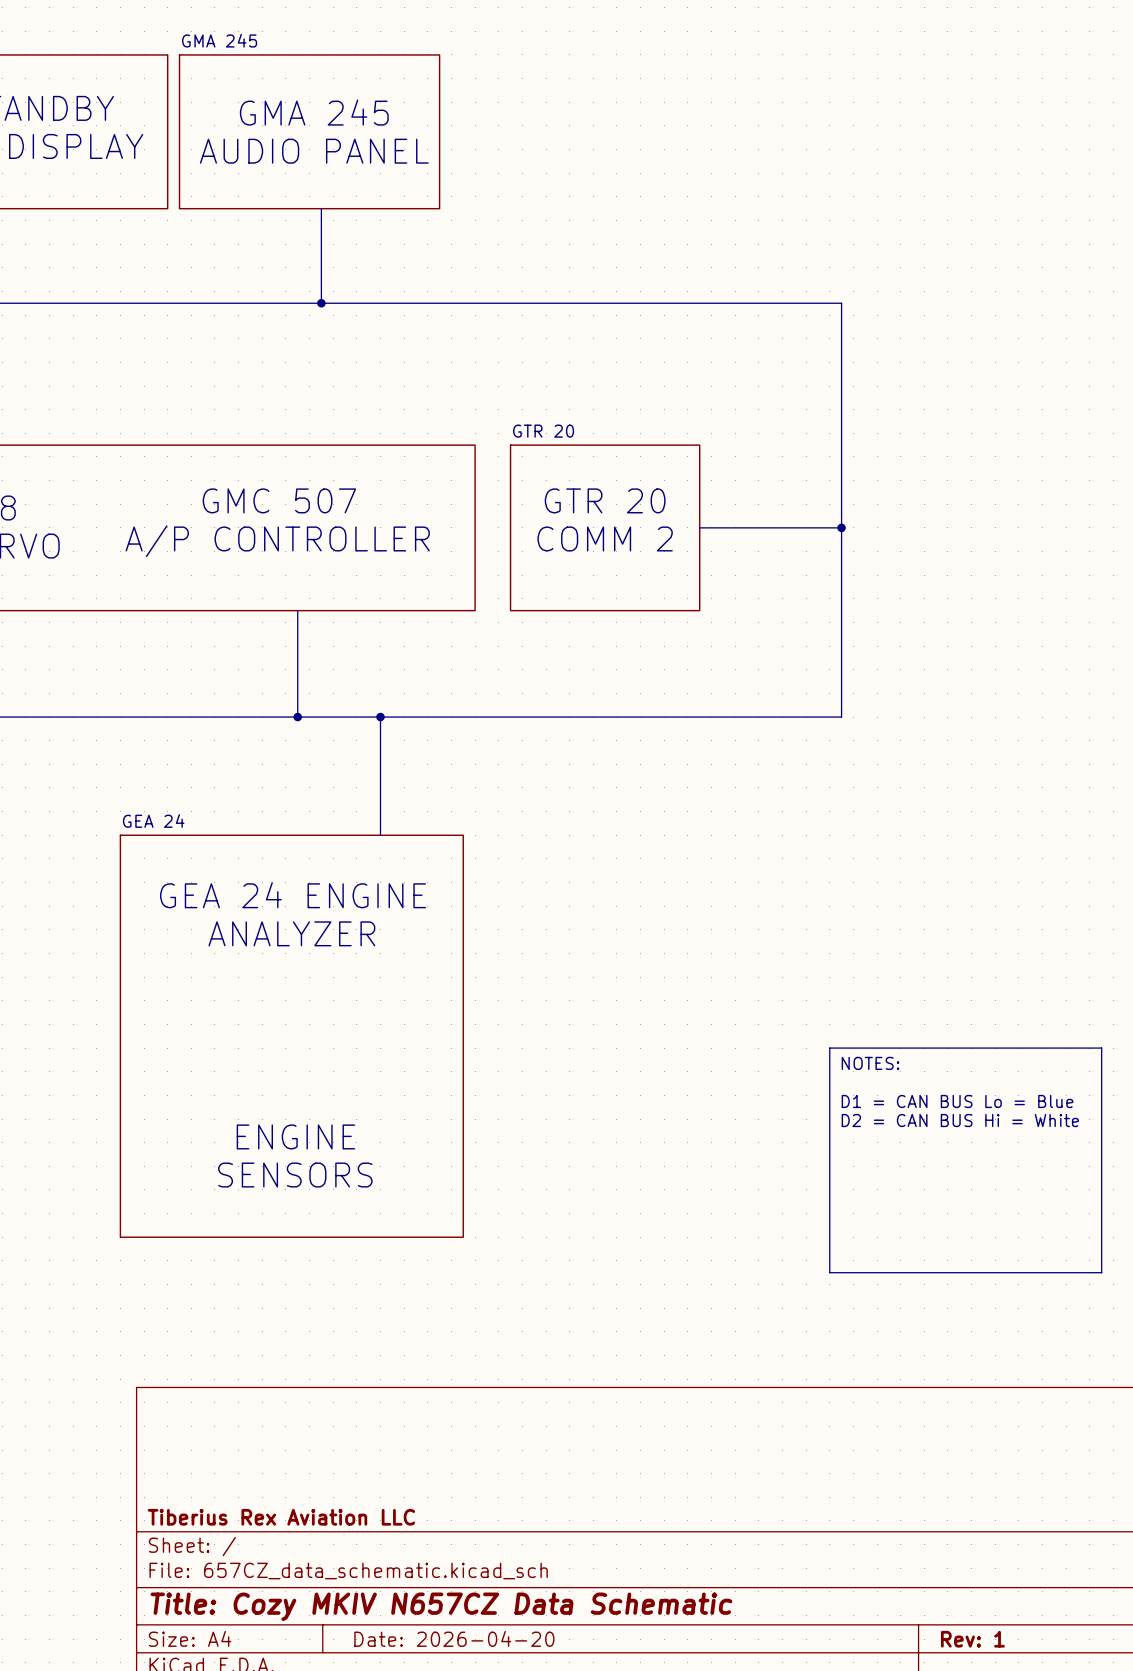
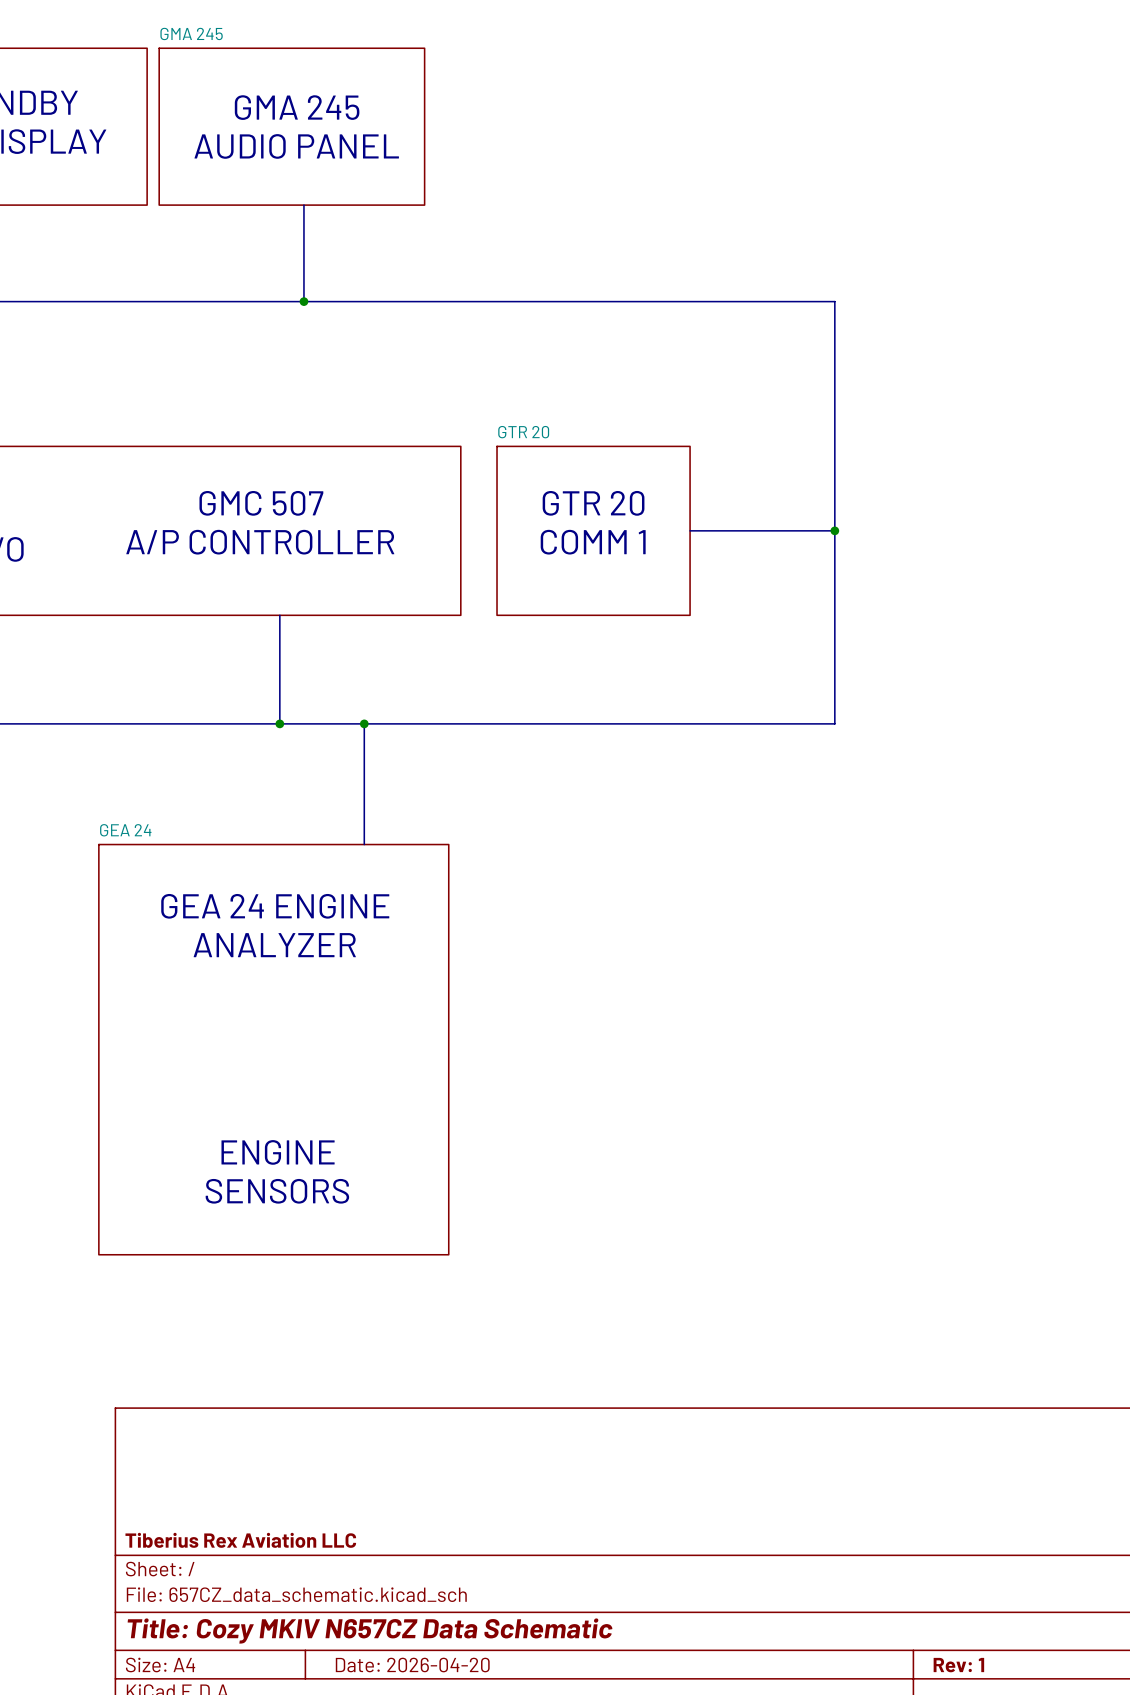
text: COMM 2 (605, 538) -> COMM 1 (593, 542)
line: (829, 1048) (1101, 1048) (1101, 1272) (829, 1272) (829, 1048) -> none
text: NOTES: (870, 1063) -> none
text: D1 = CAN BUS Lo = Blue (957, 1101) -> none
text: D2 = CAN BUS Hi = White (960, 1120) -> none

